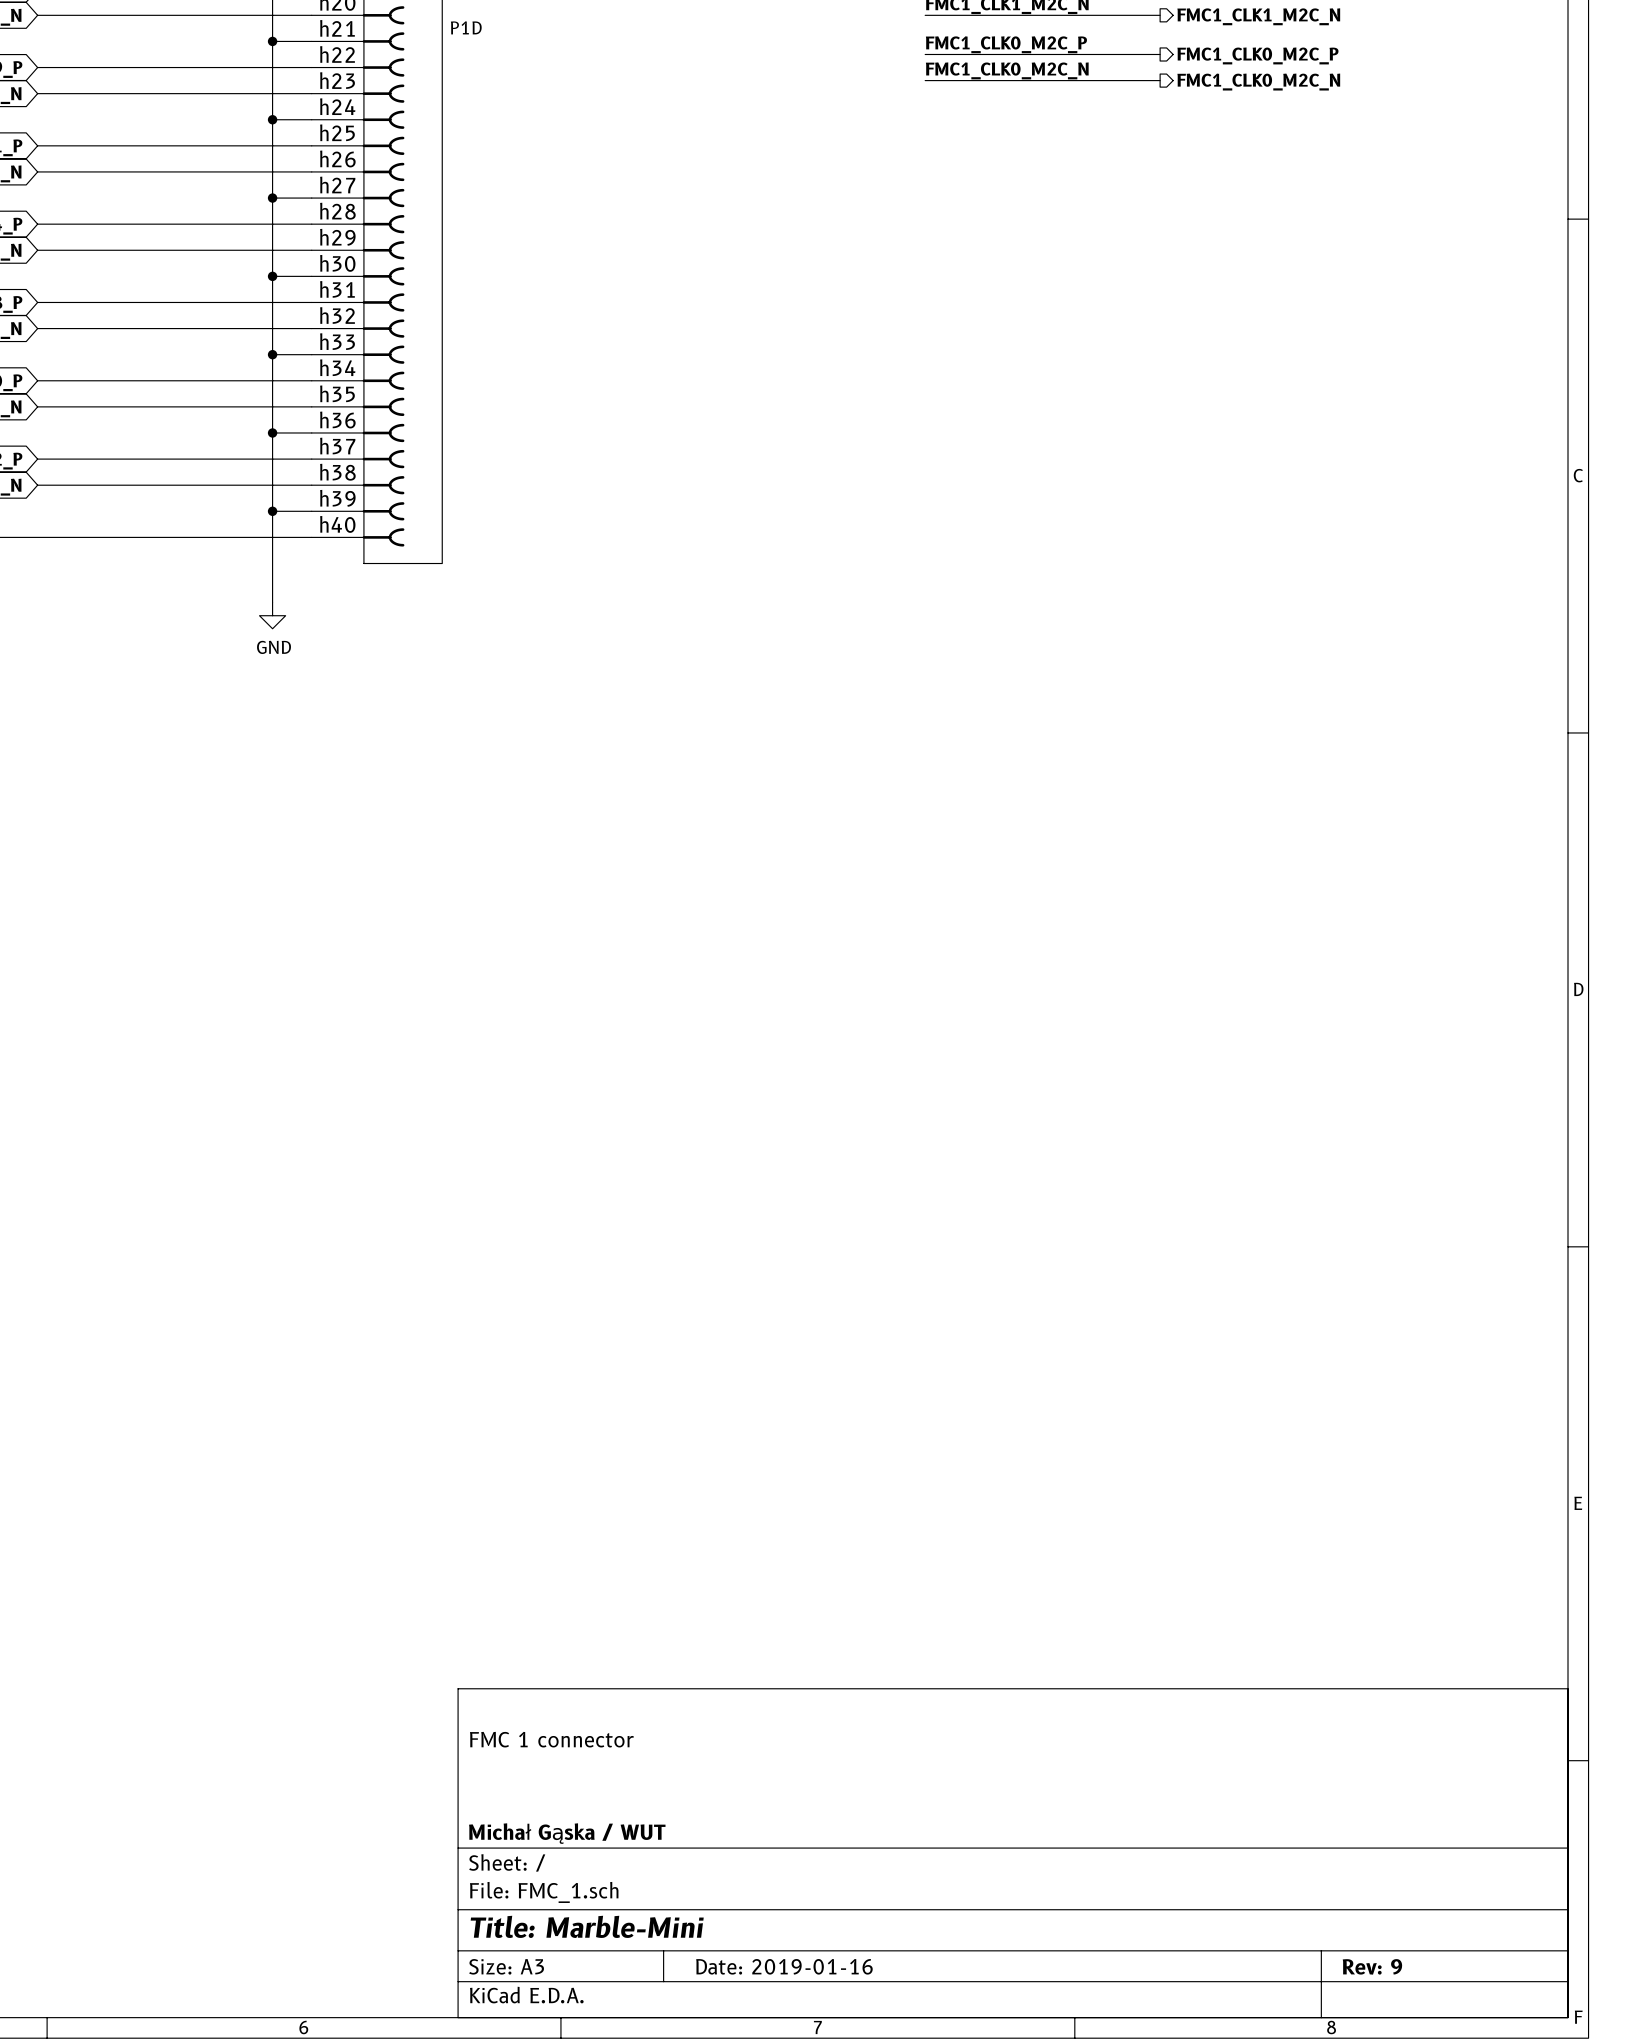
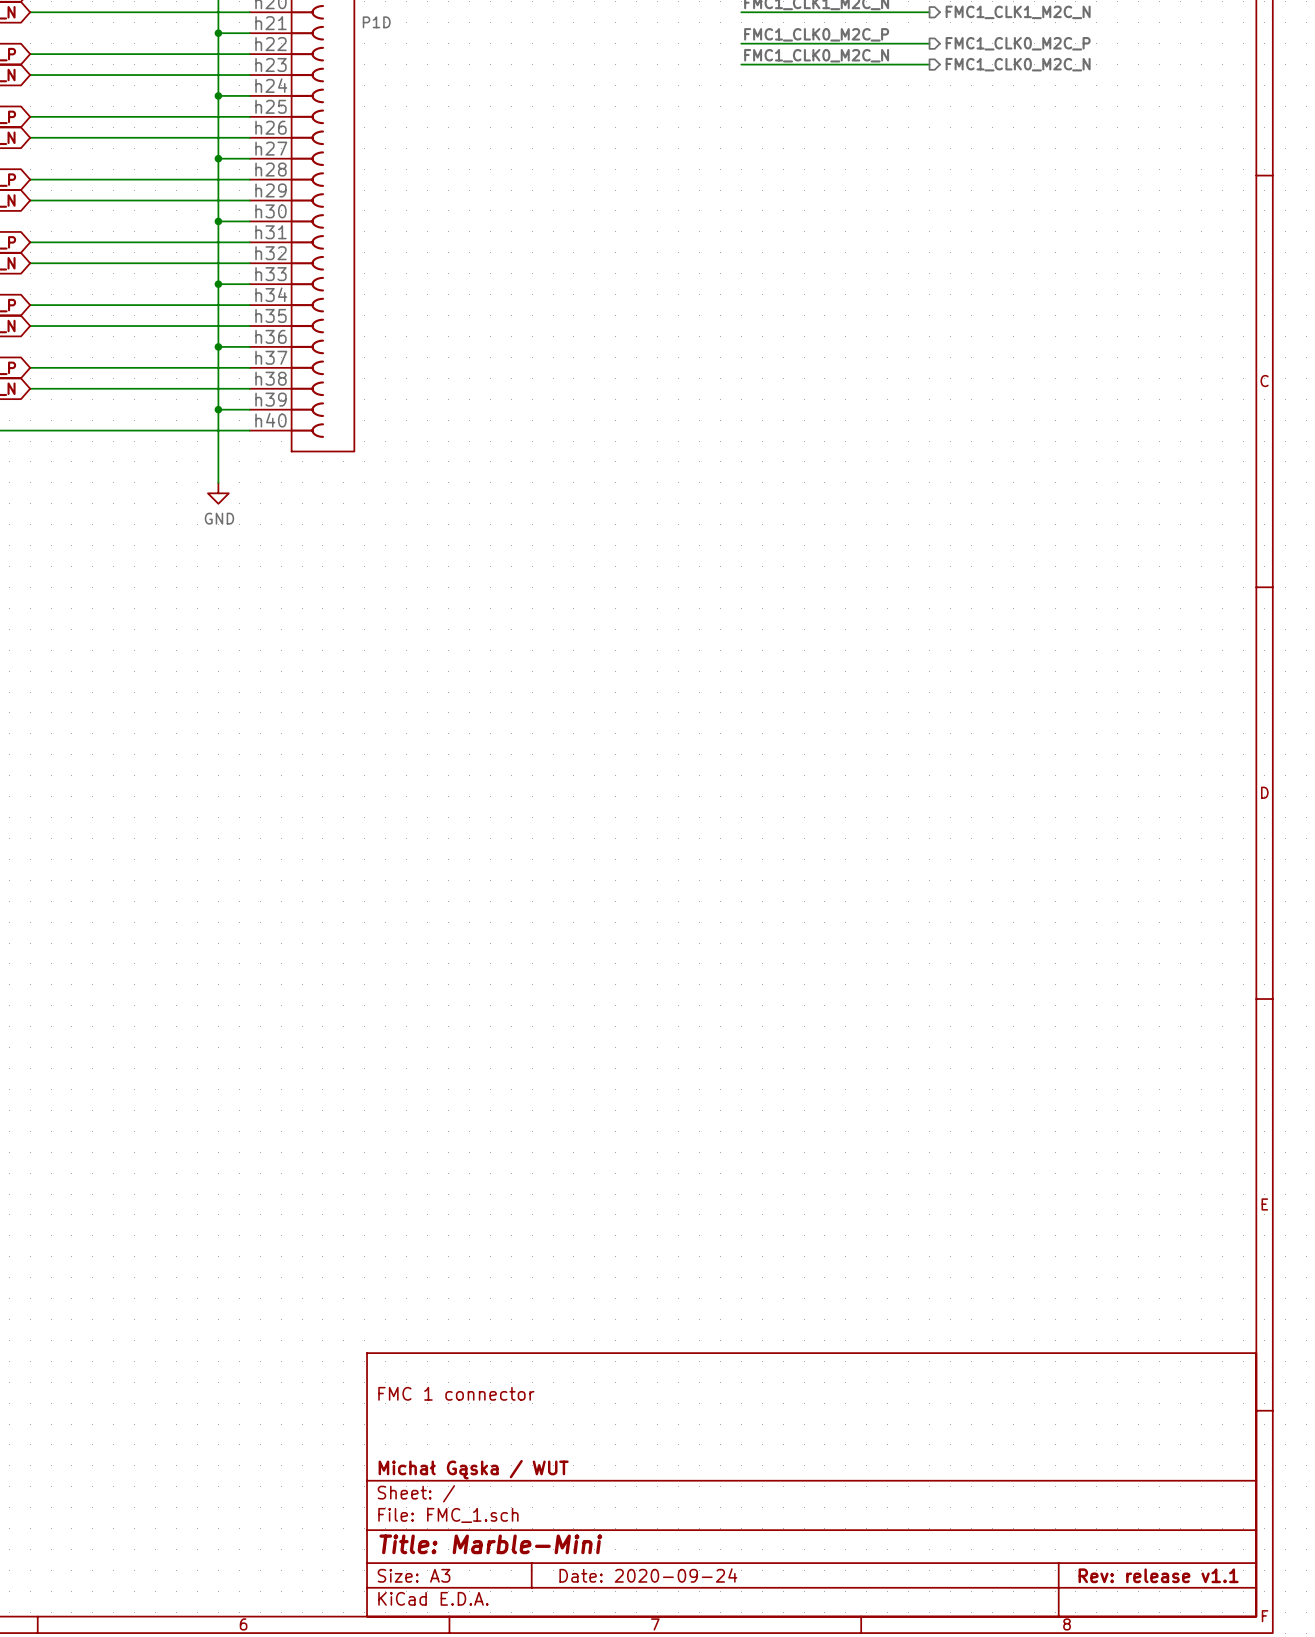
title block: Date: 2019-01-16 (784, 1966) -> Date: 2020-09-24 (648, 1575)
title block: Rev: 9 (1372, 1966) -> Rev: release v1.1 (1158, 1575)

